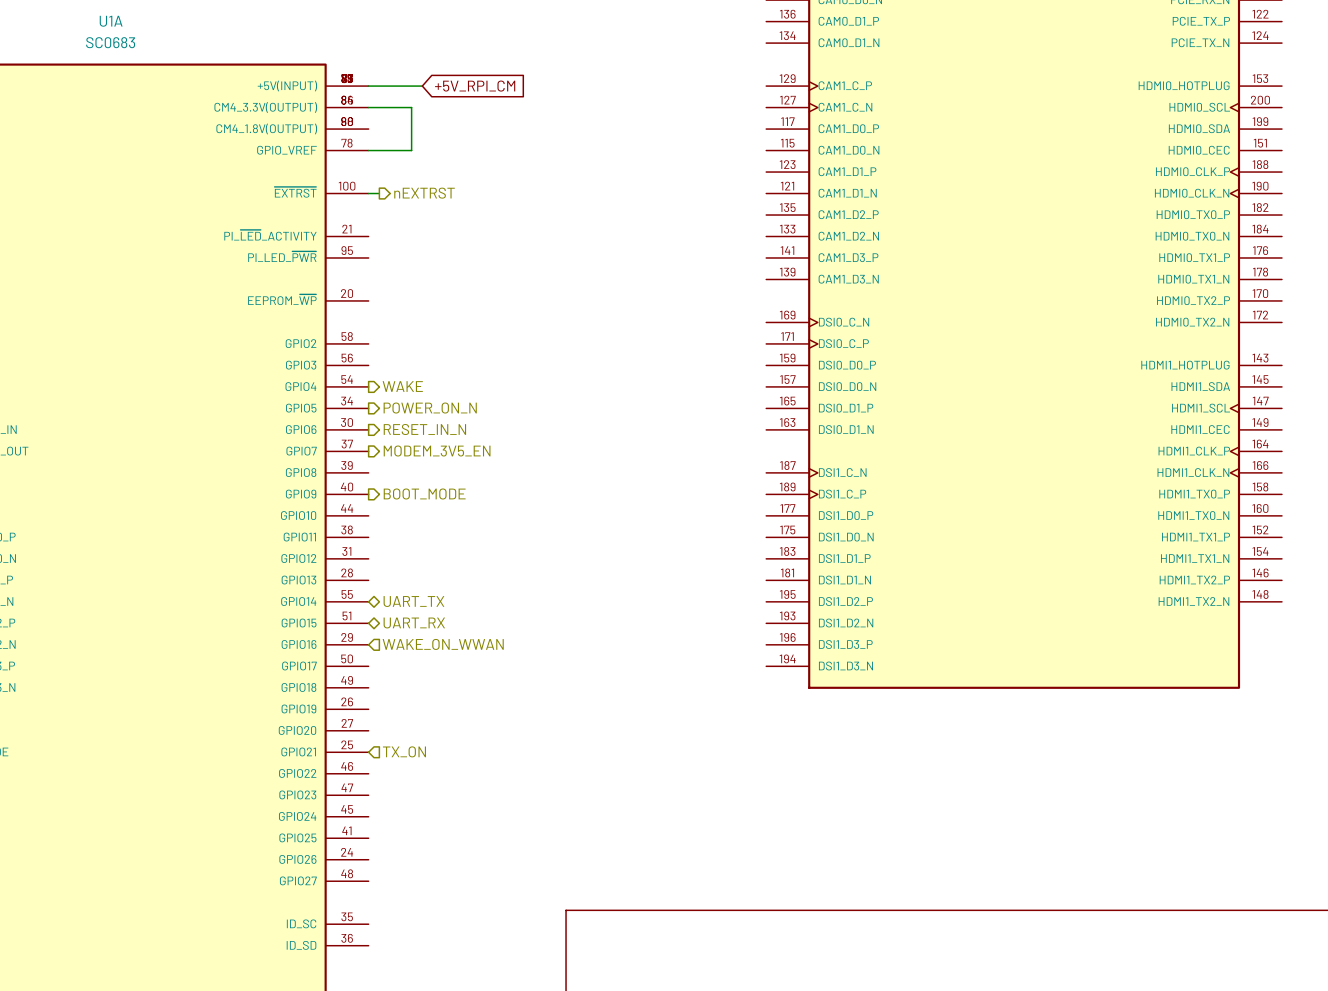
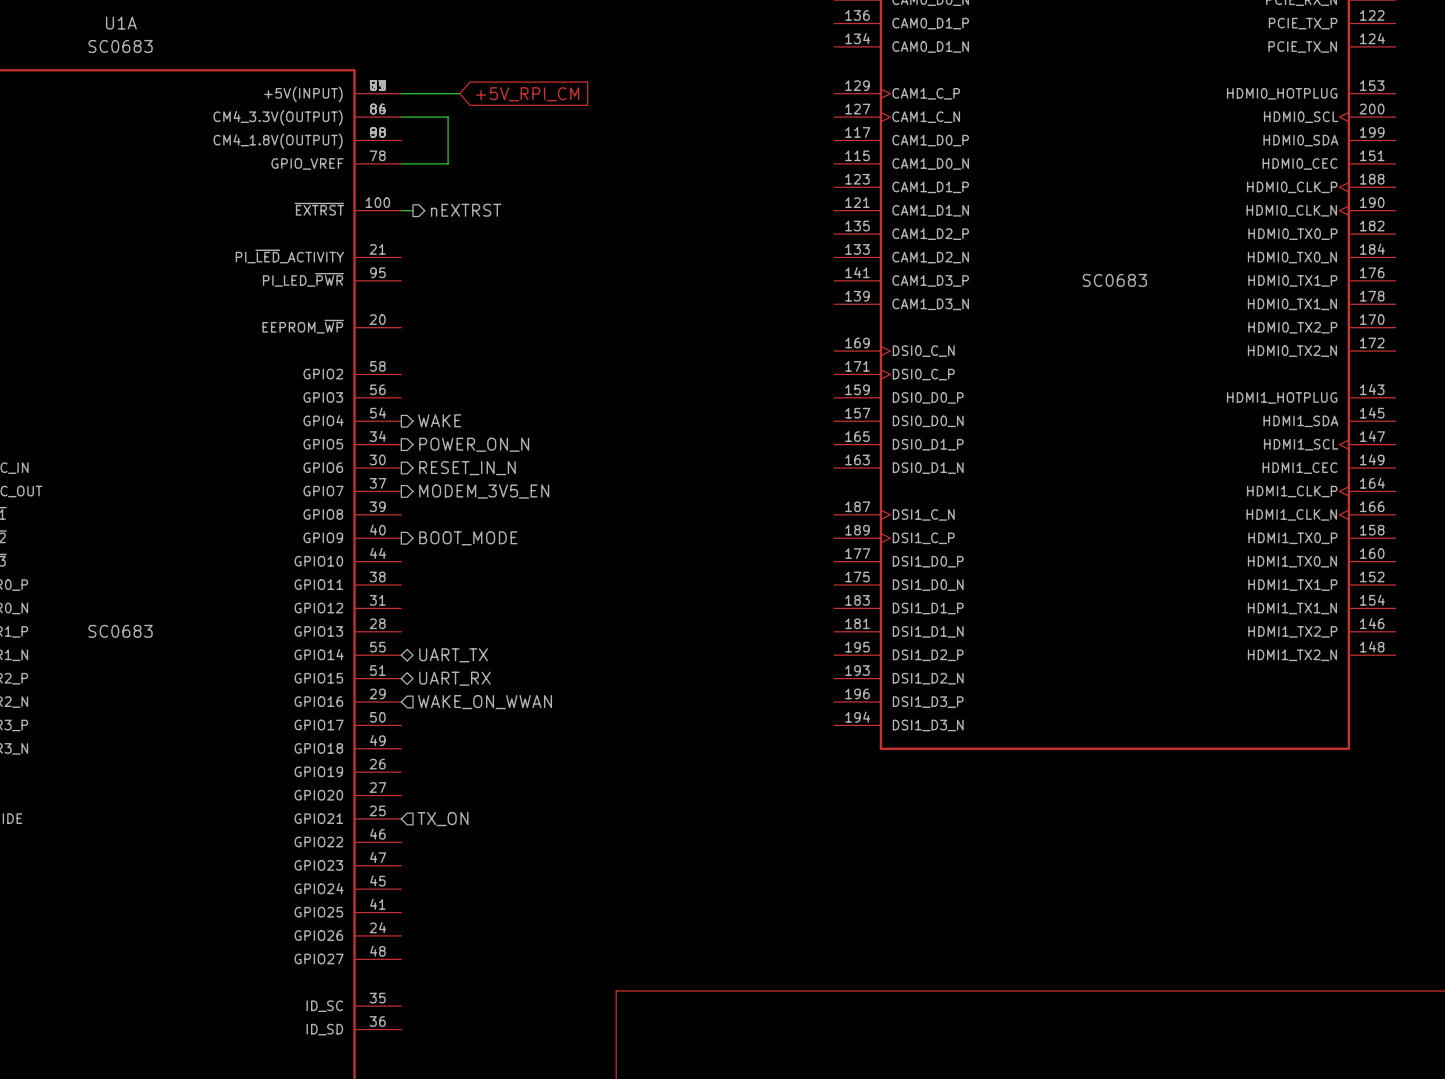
part text: none -> SC0683 (1114, 280)
U1A text: none -> SC0683 (120, 631)

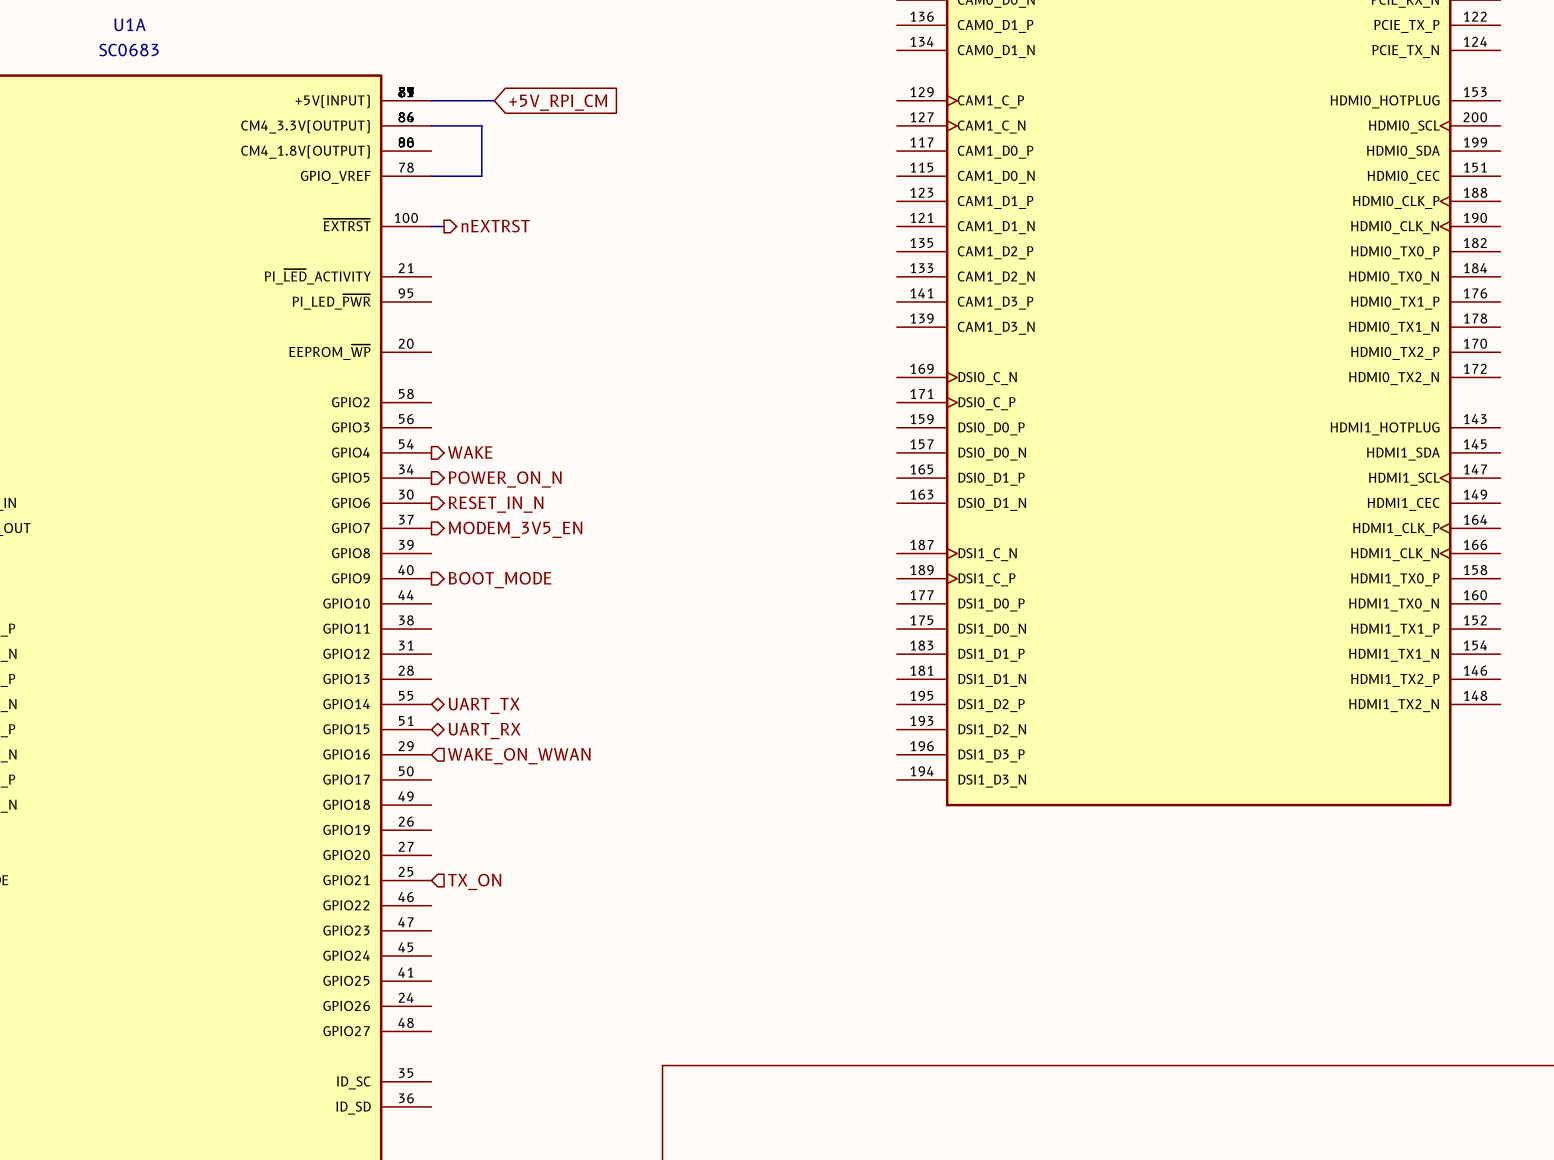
part text: SC0683 (1114, 280) -> none
U1A text: SC0683 (120, 631) -> none

